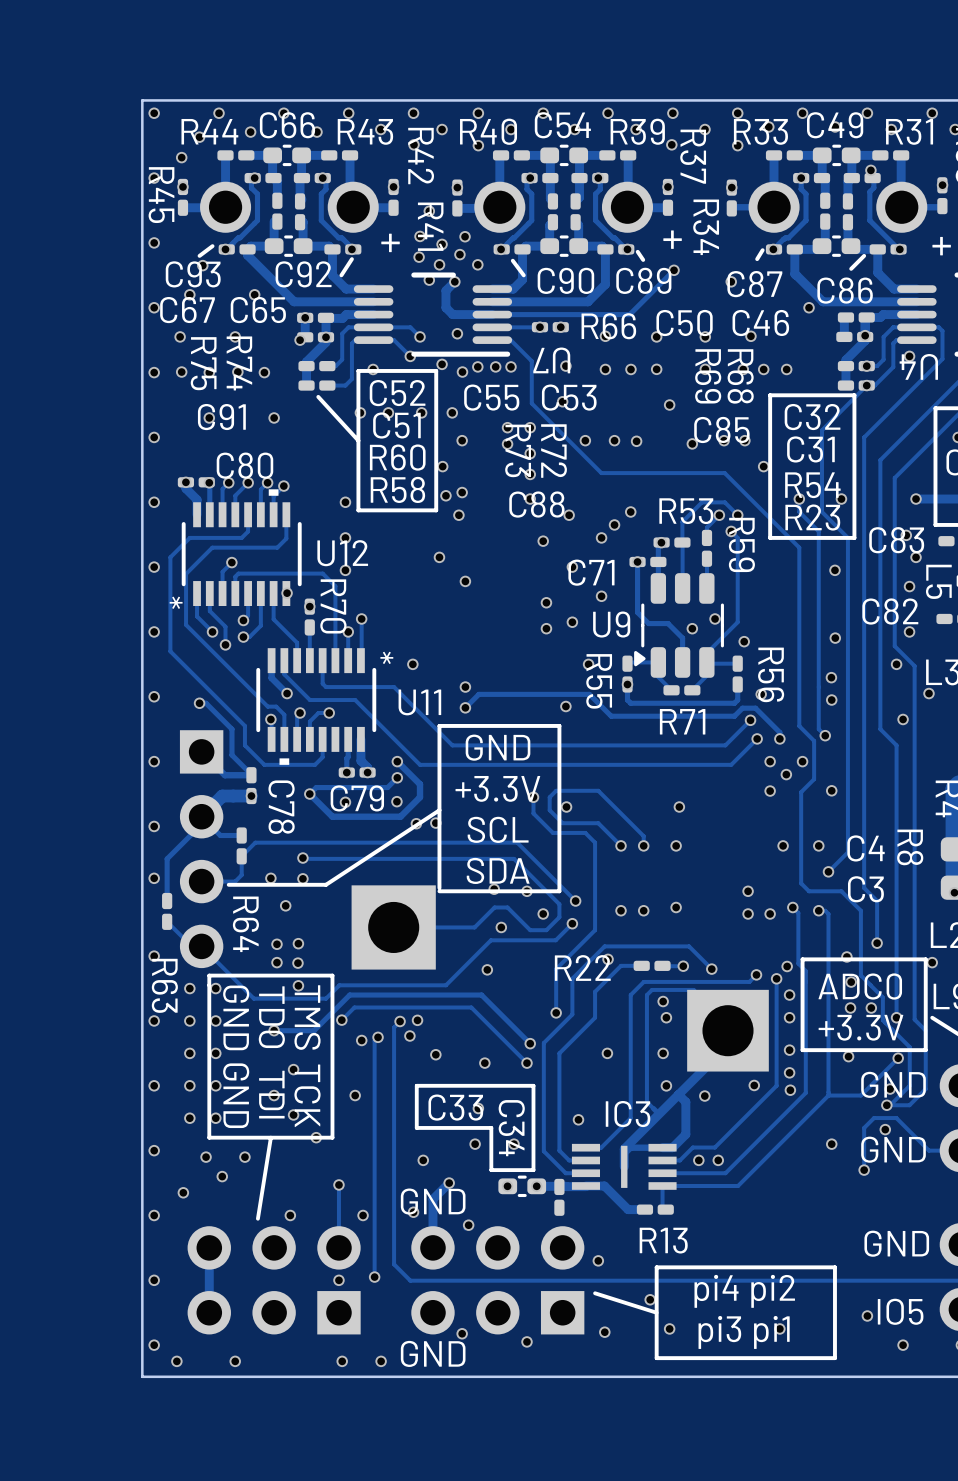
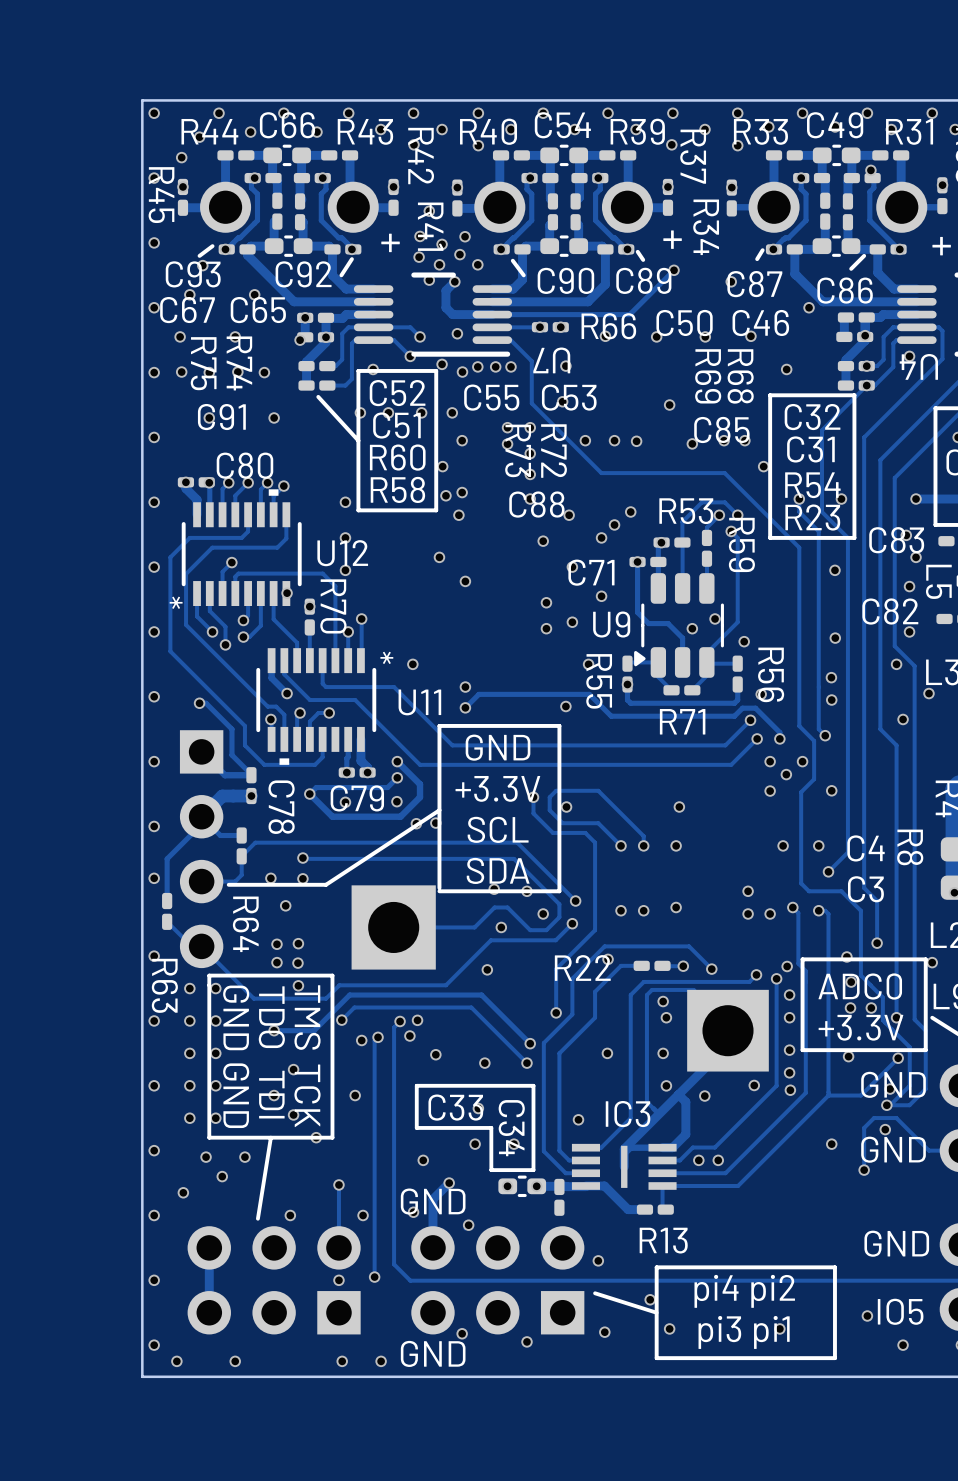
via: (605, 369) -> none
via: (630, 369) -> none
via: (656, 369) -> none
via: (705, 369) -> none
via: (743, 369) -> none
via: (763, 369) -> none

